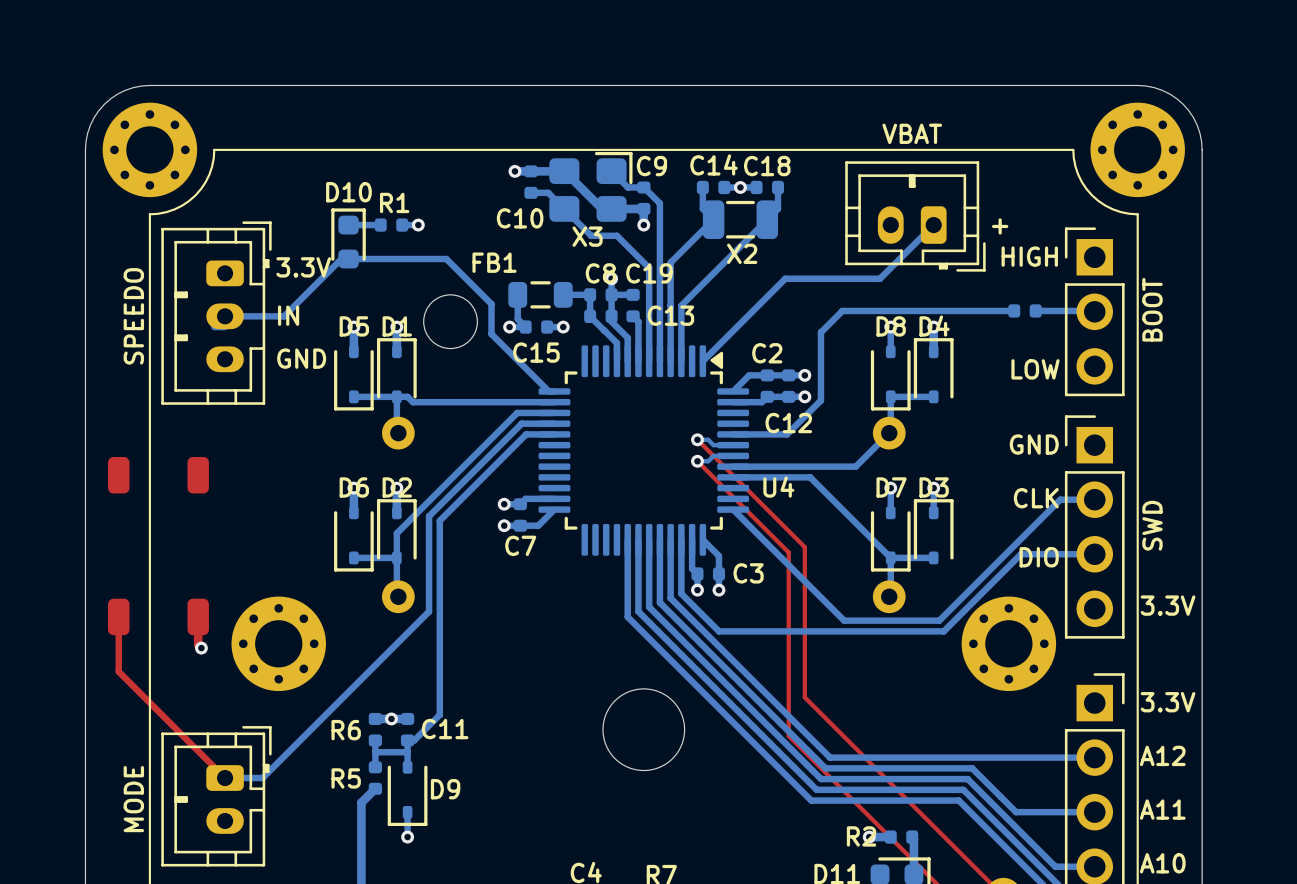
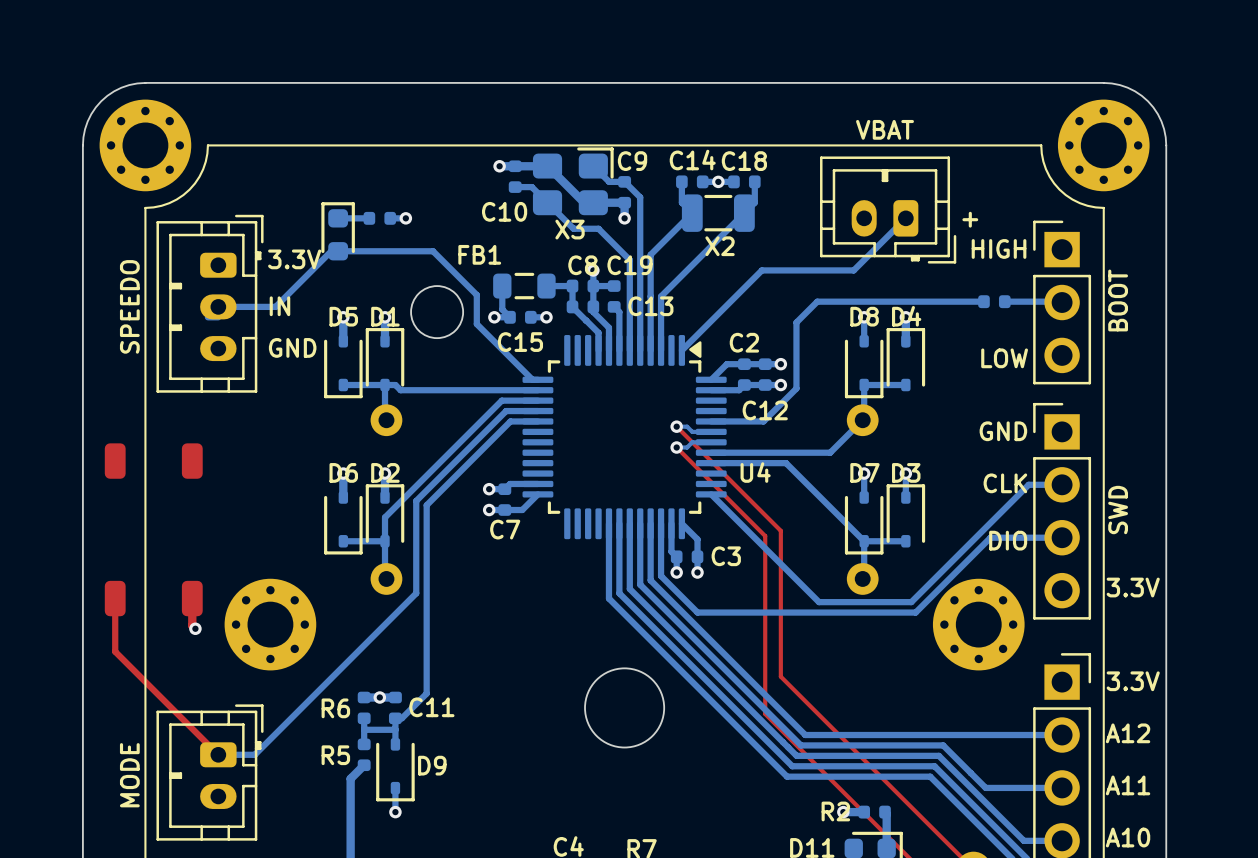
D10 name: D10 (348, 192) -> none
R1 name: R1 (394, 202) -> none

